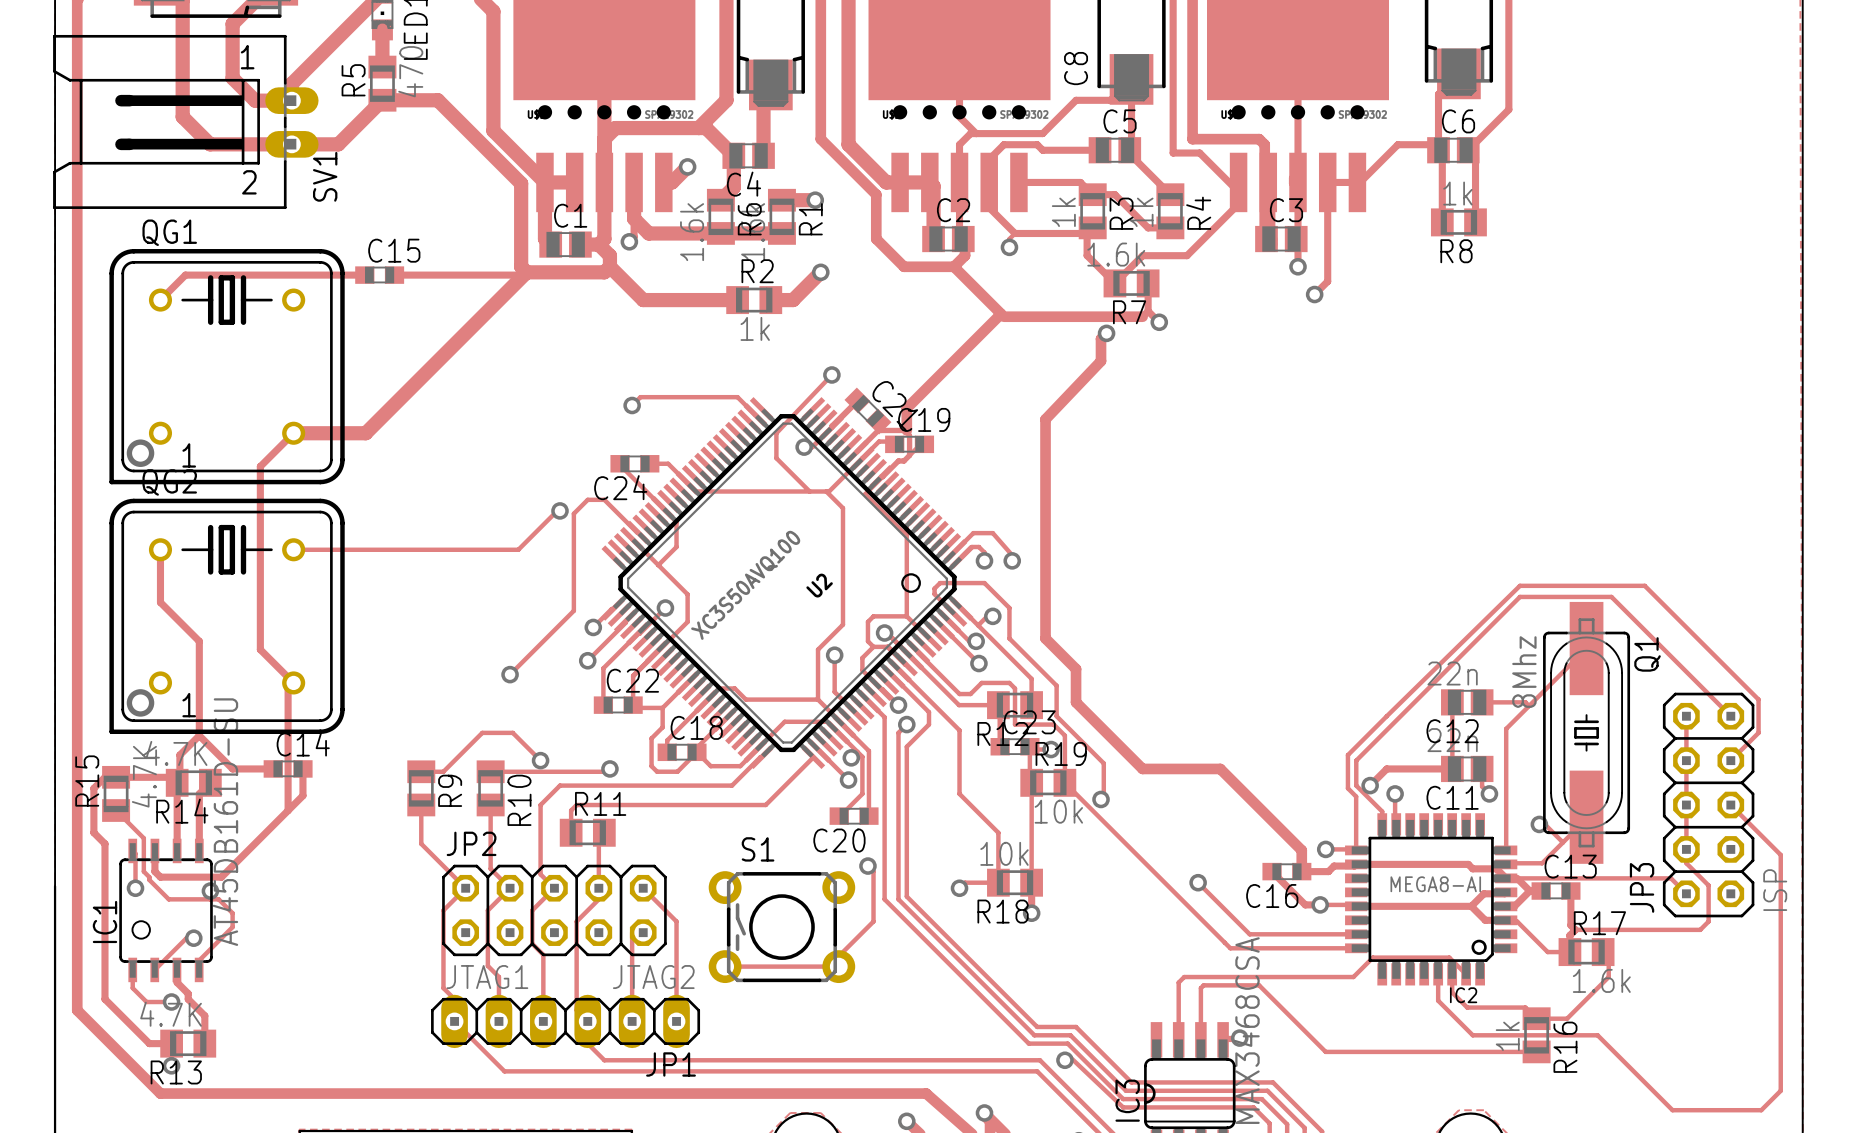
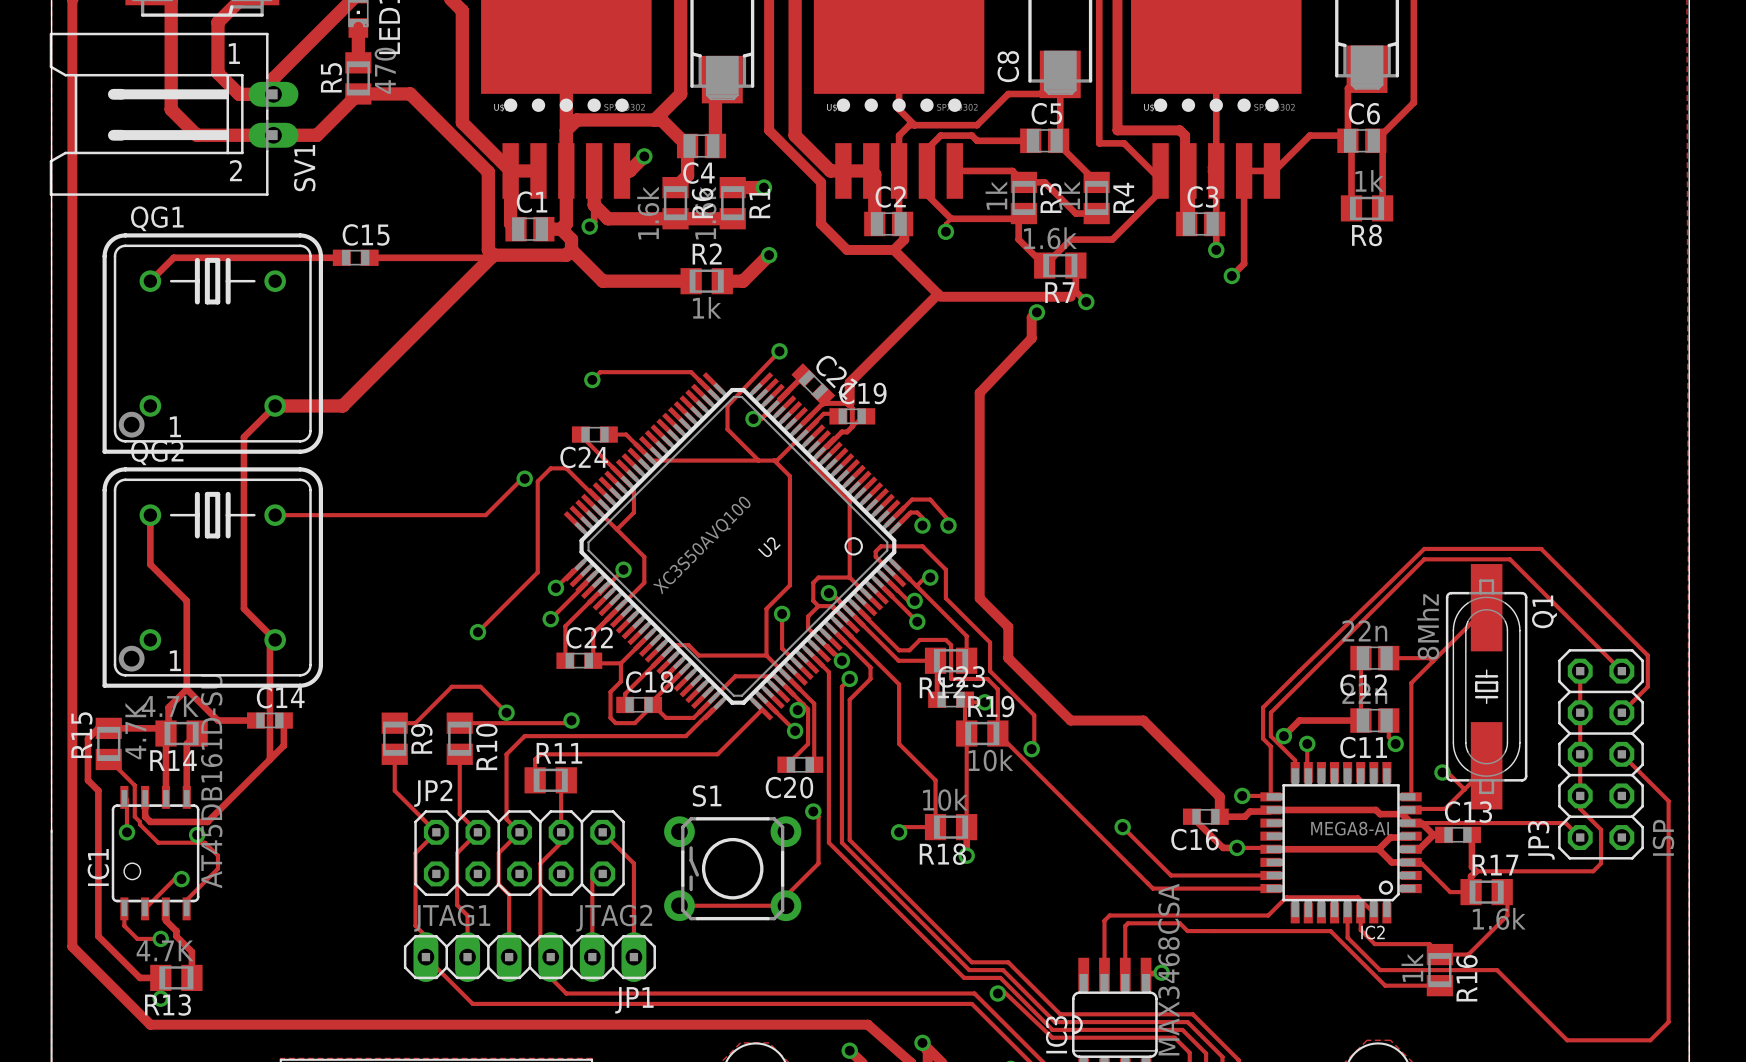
track: (1267, 993) (1325, 1051) (1478, 1051) -> (1187, 931) (1330, 931) (1385, 985)

